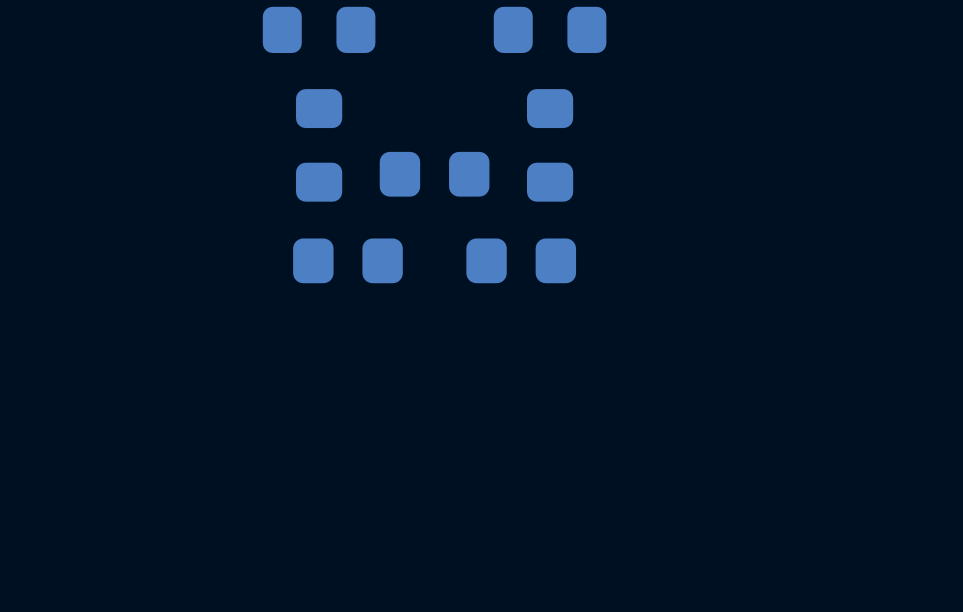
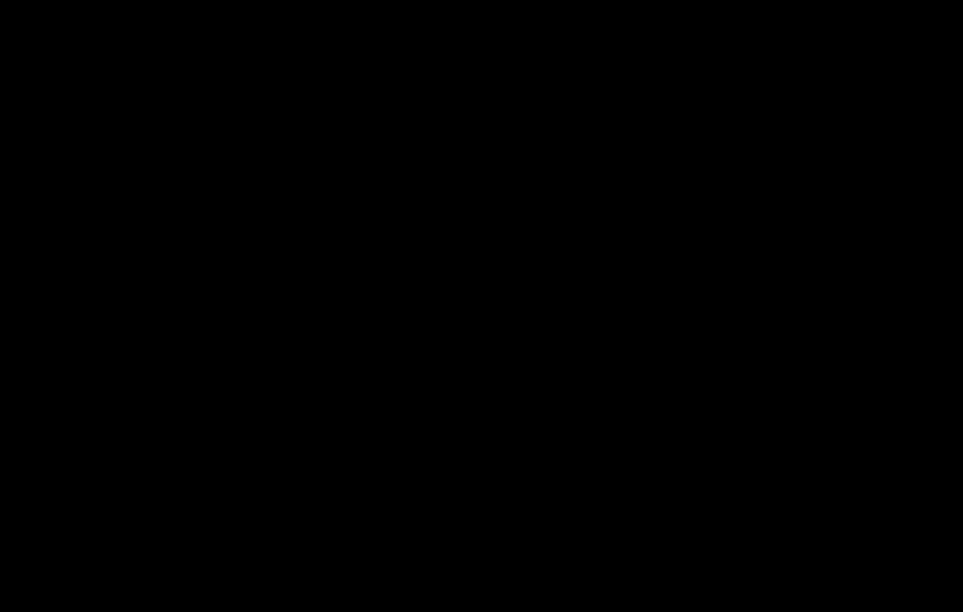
part: (319, 29) -> none
part: (550, 29) -> none
part: (319, 145) -> none
part: (550, 145) -> none
part: (434, 174) -> none
part: (347, 260) -> none
part: (521, 260) -> none

